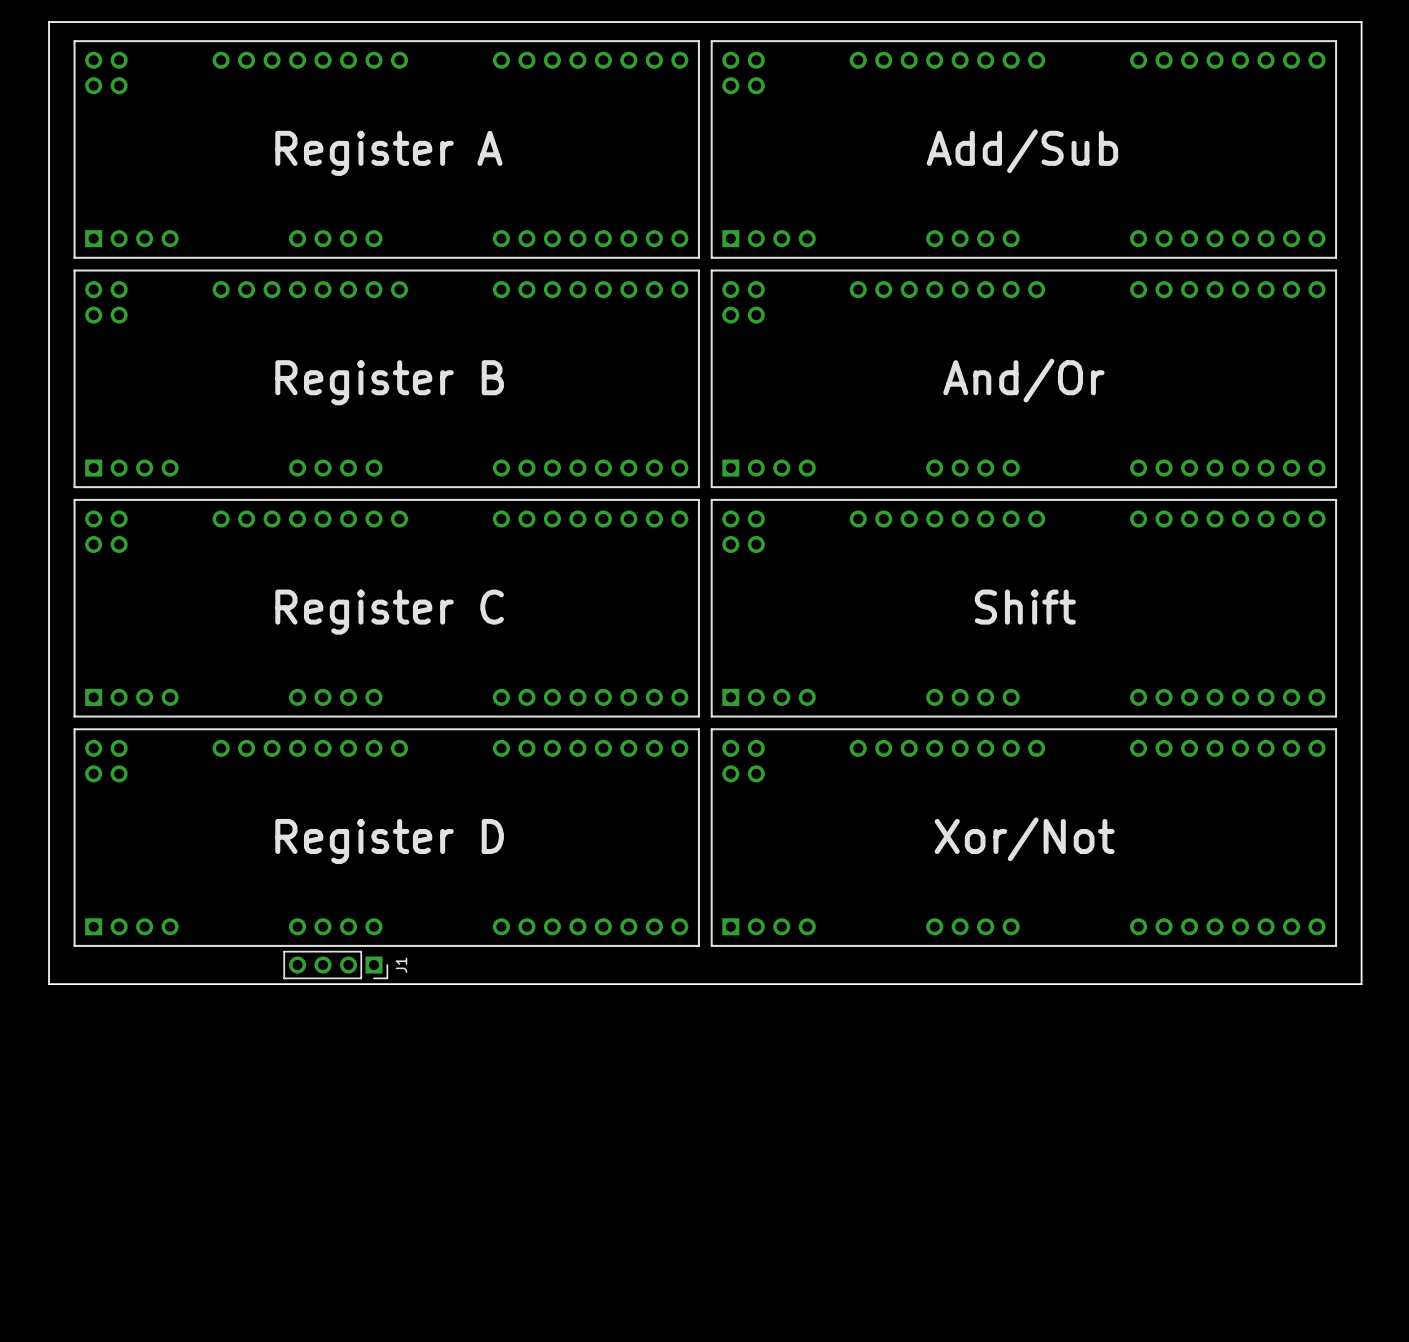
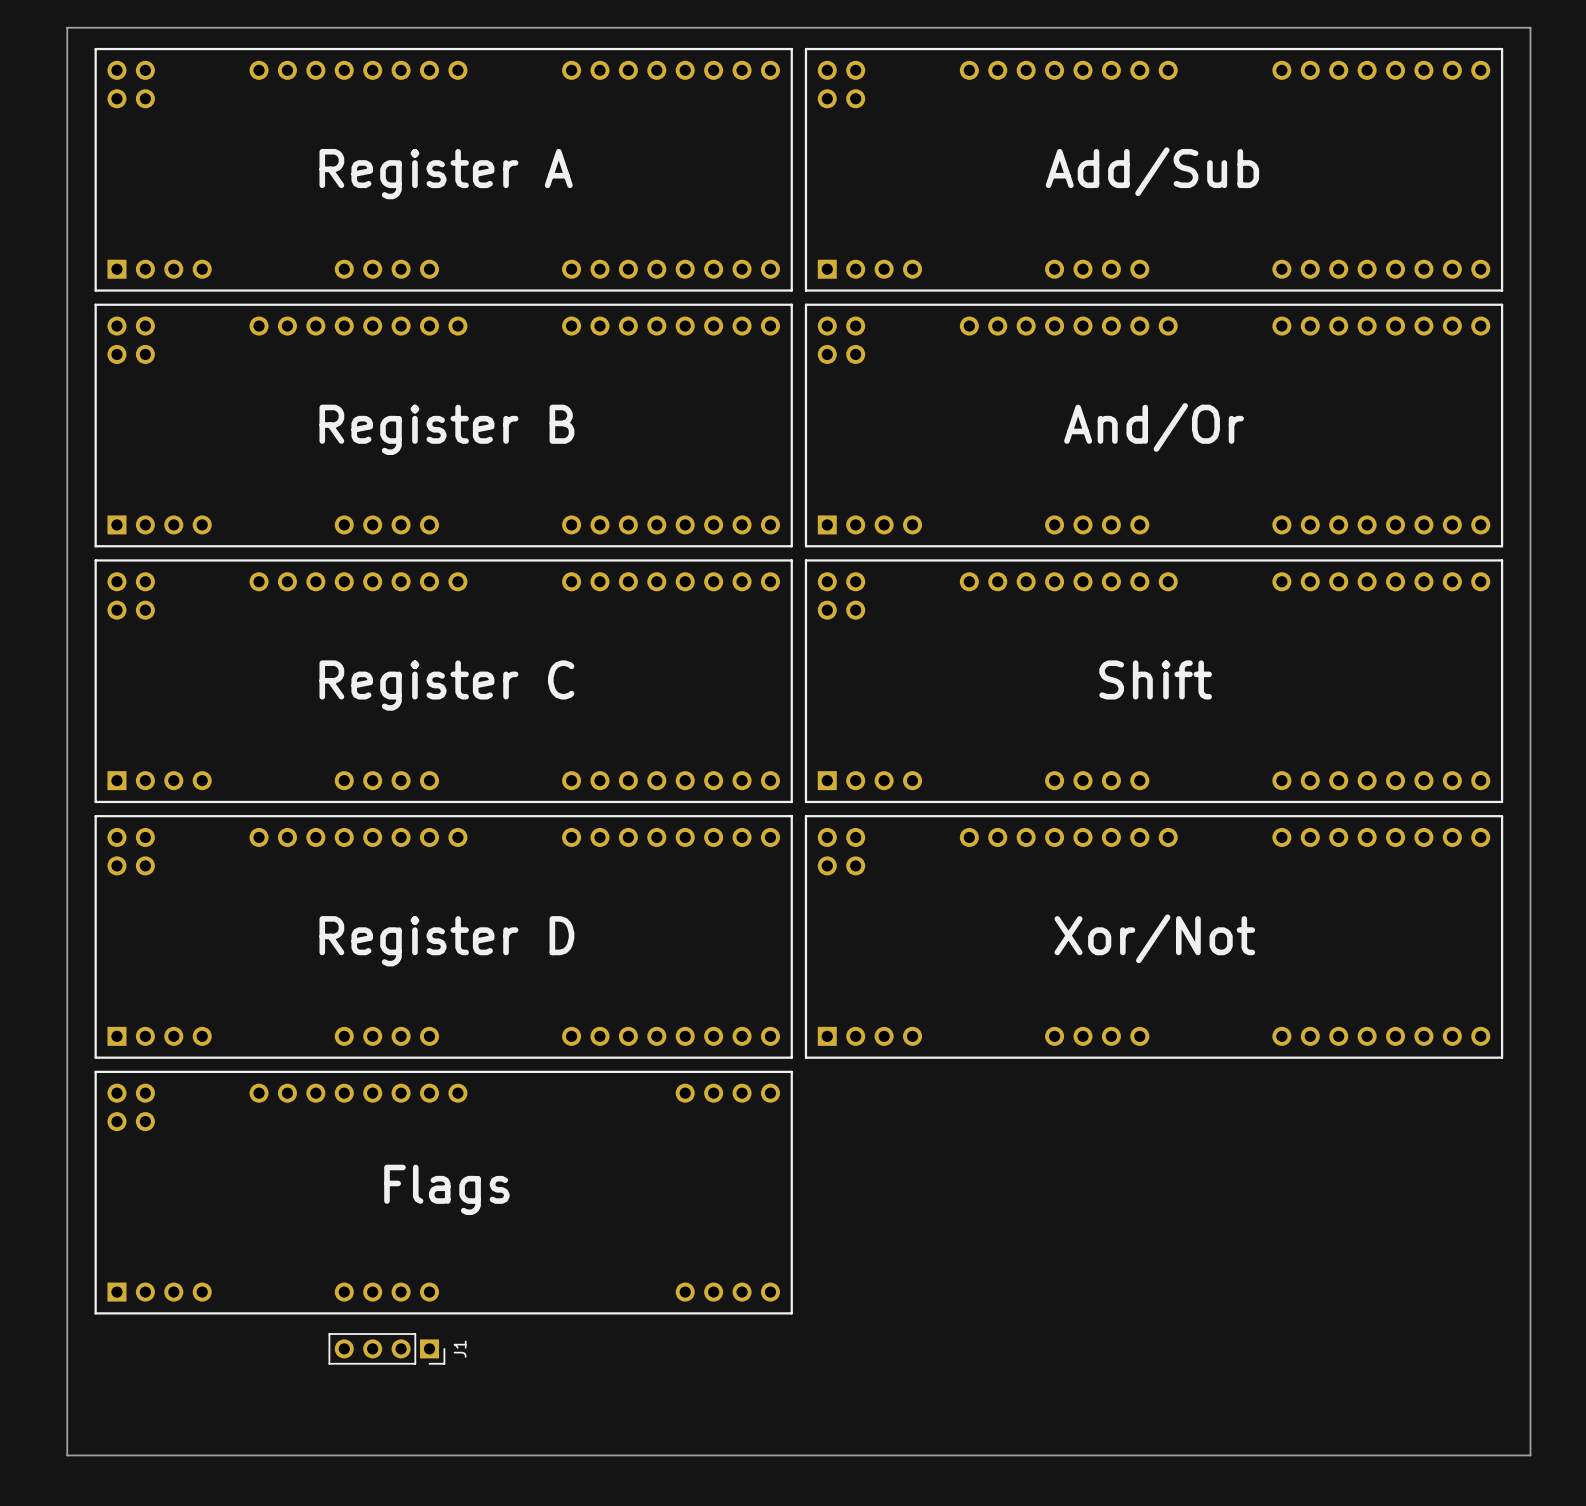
J1 position: (335, 965) -> (386, 1348)
board edge: (49, 984) (1361, 984) -> (67, 1100) (67, 1455) (1530, 1455) (1530, 1100)
part: none -> Flags (443, 1192)

